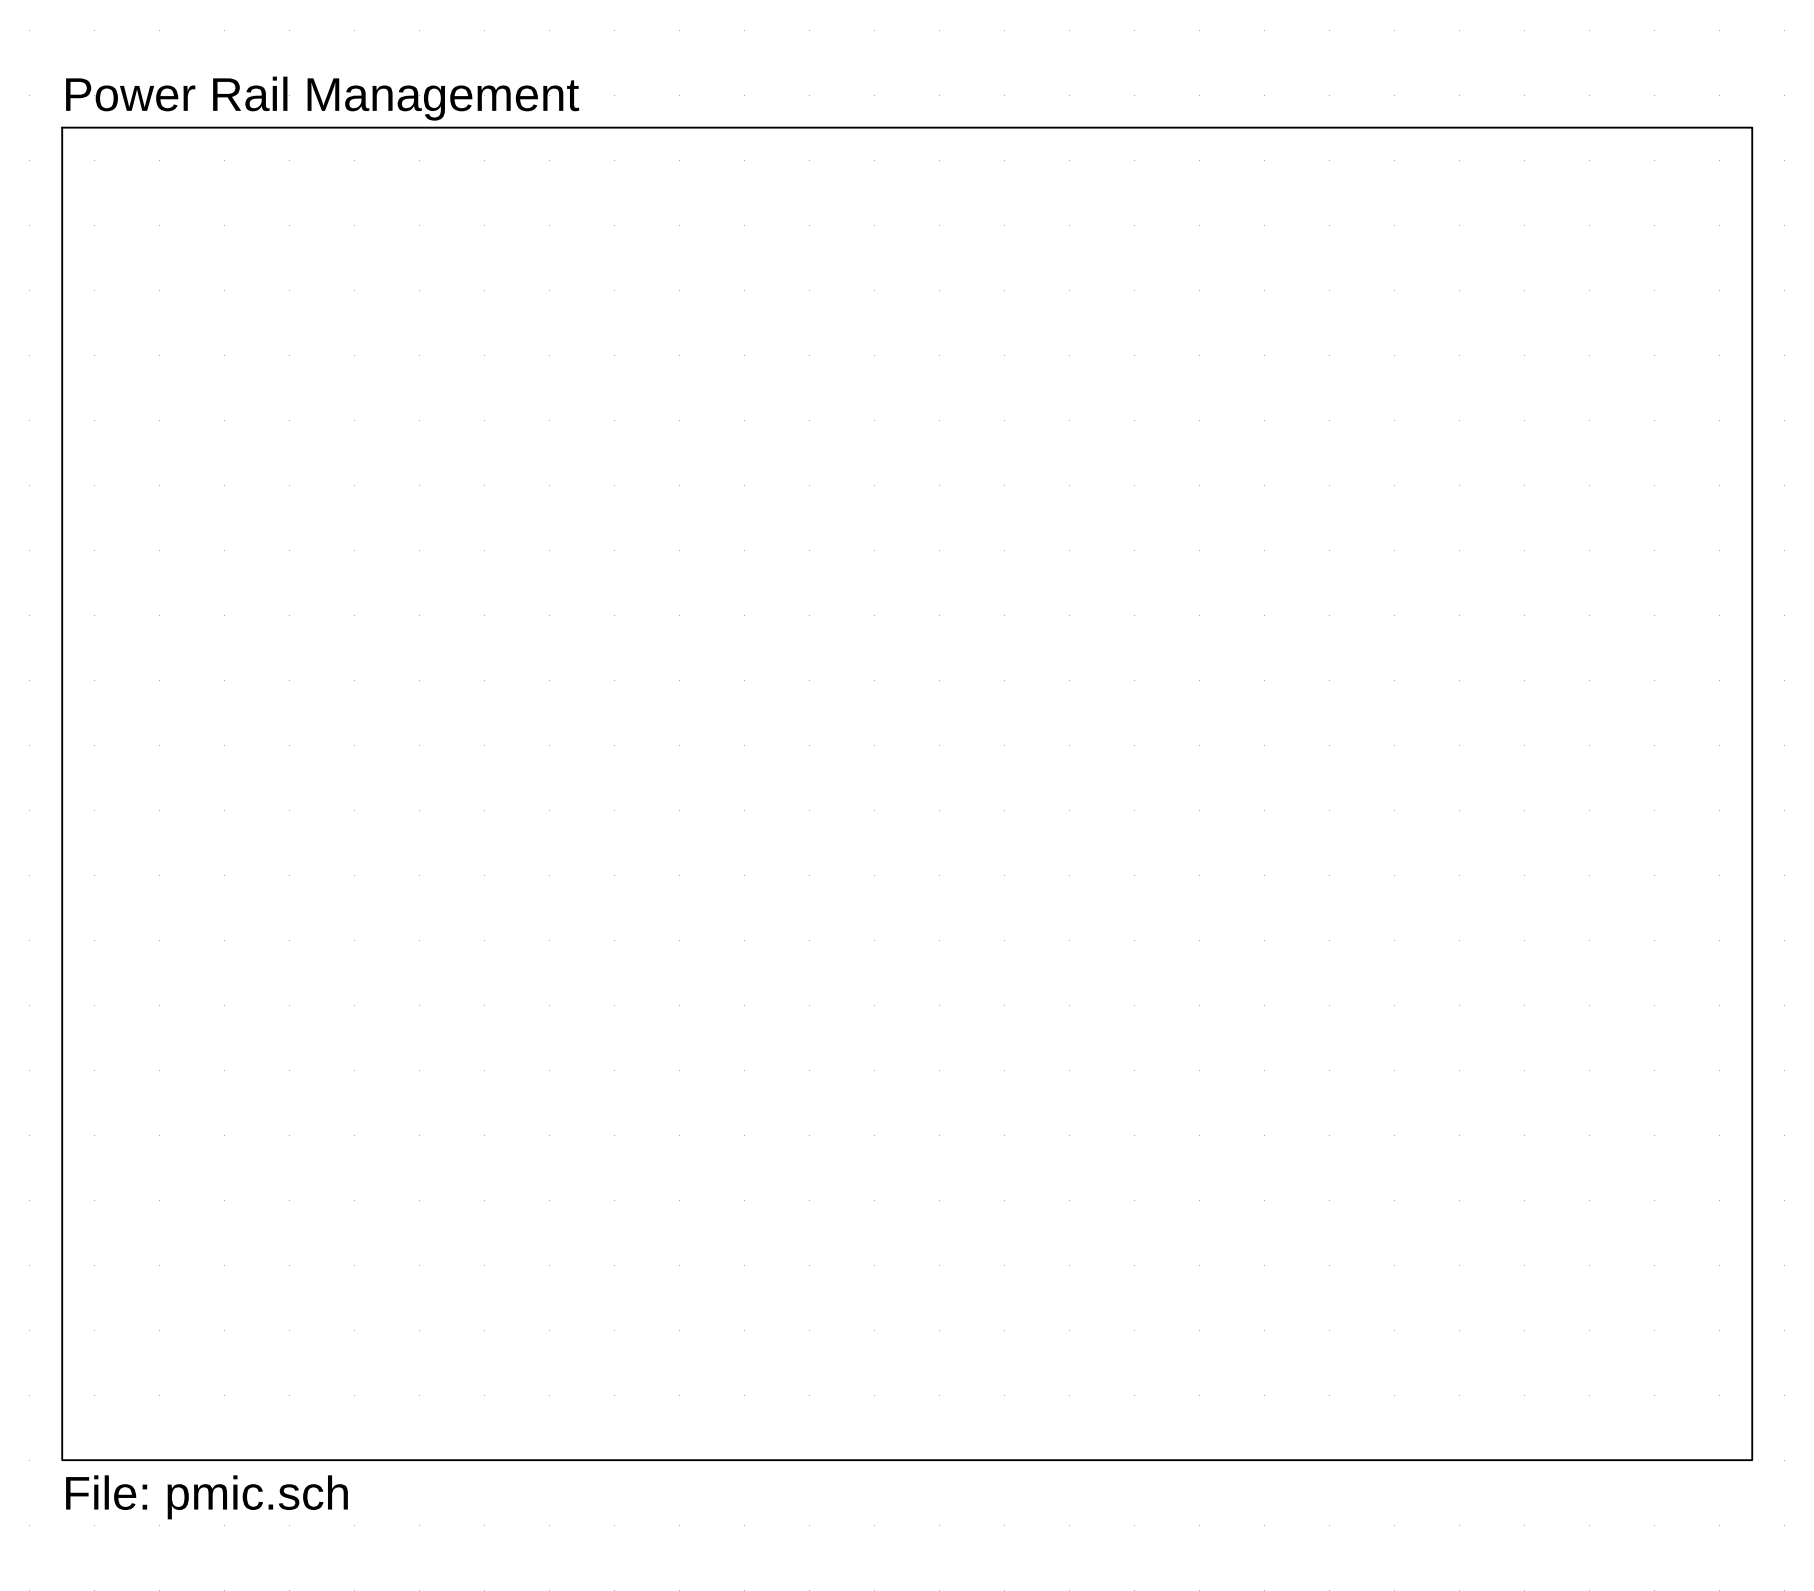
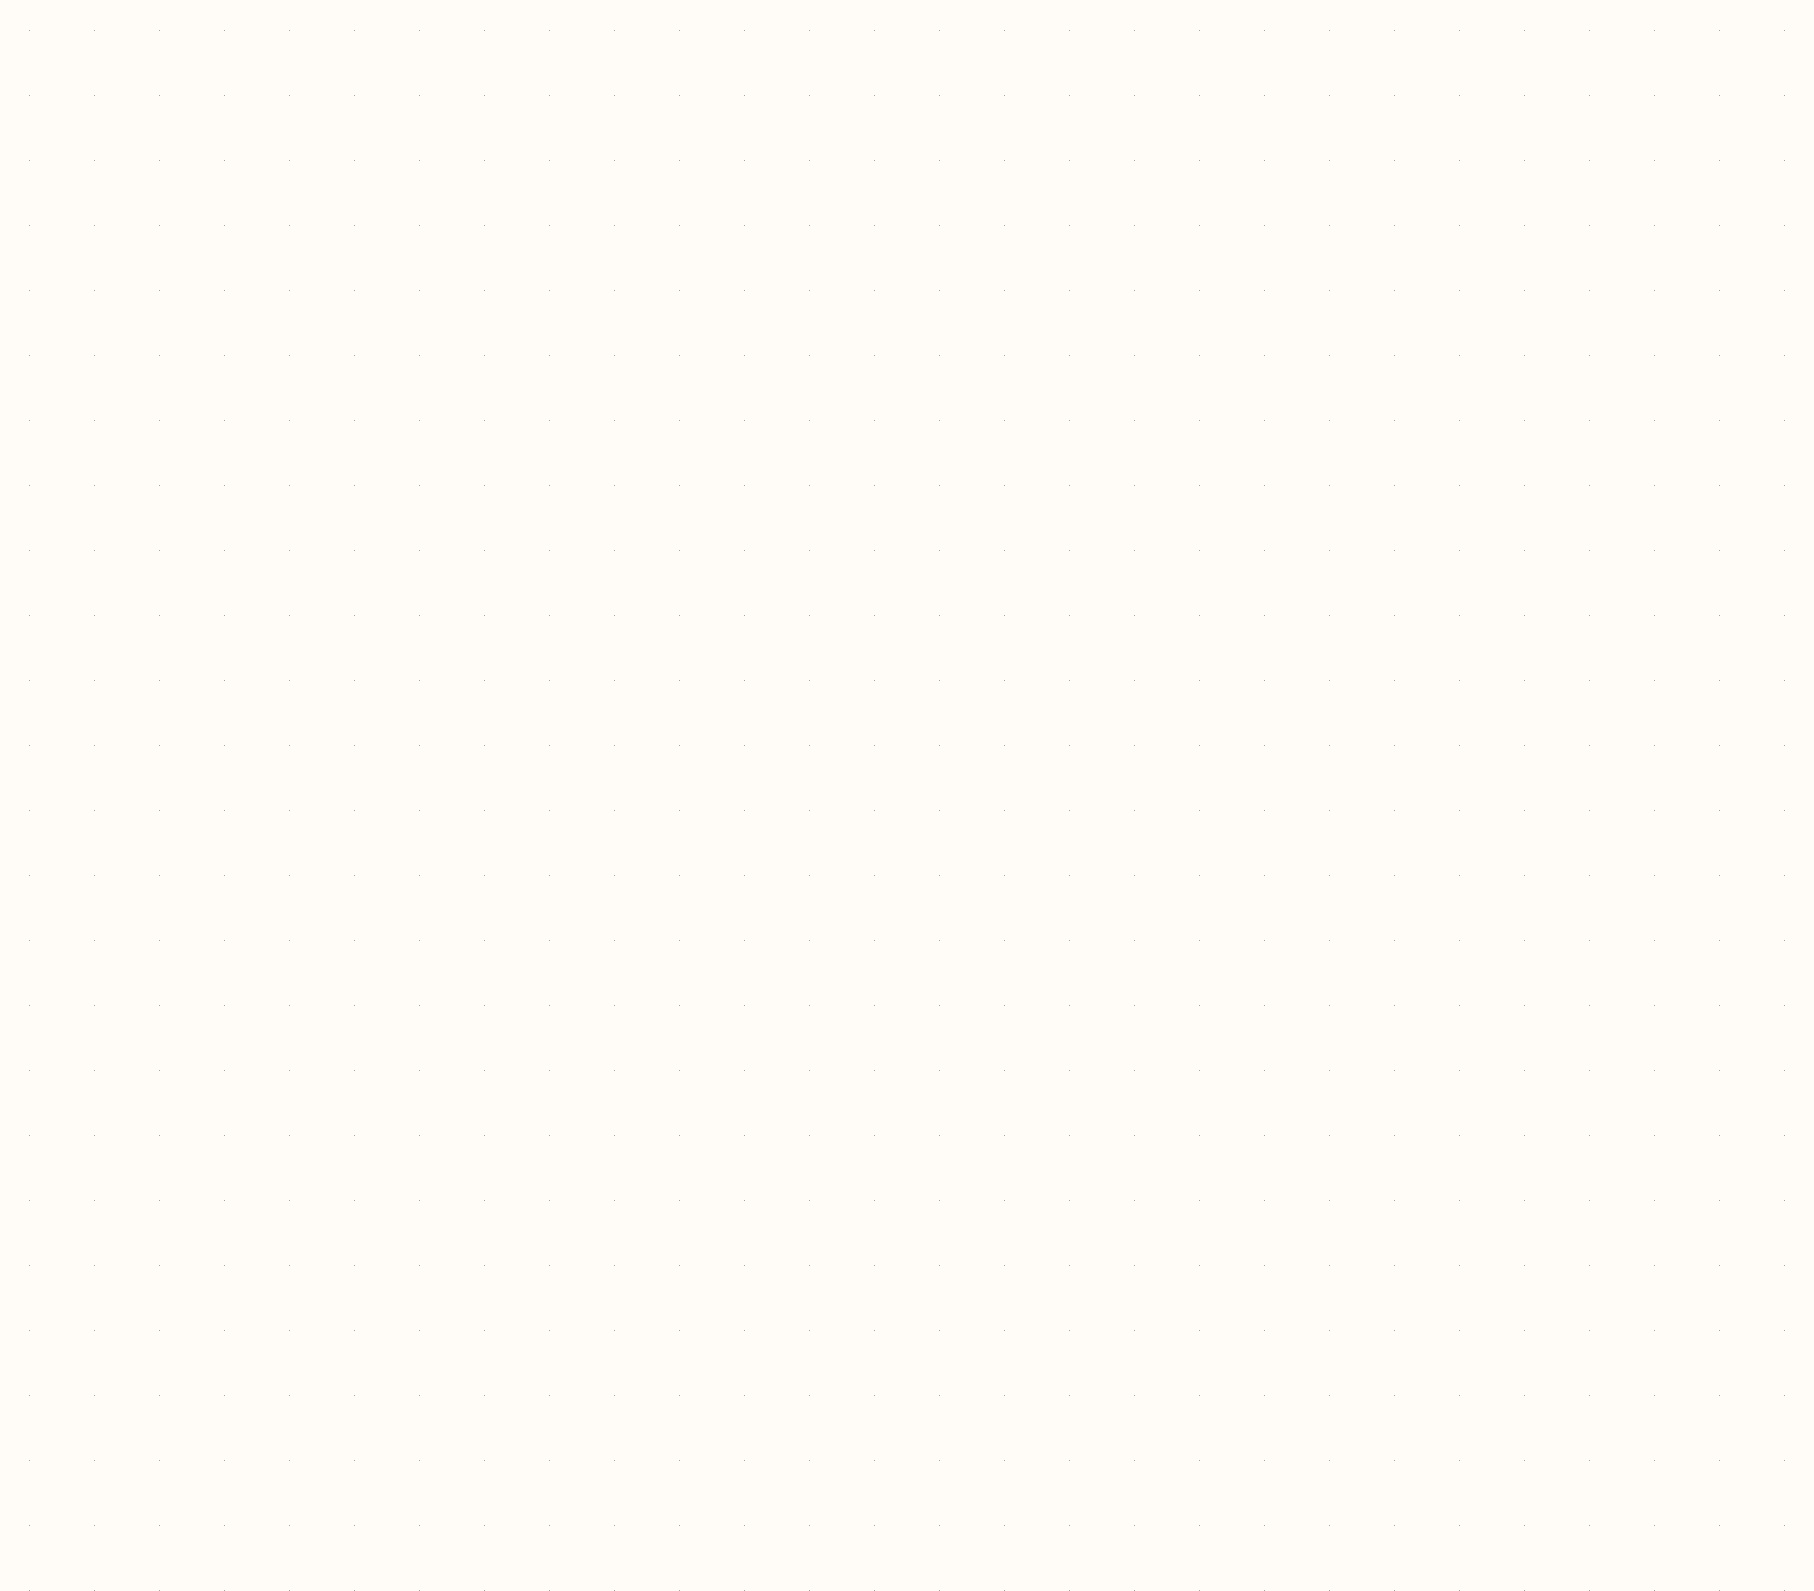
sheet Power Rail Management: File: pmic.sch (907, 793) -> none

